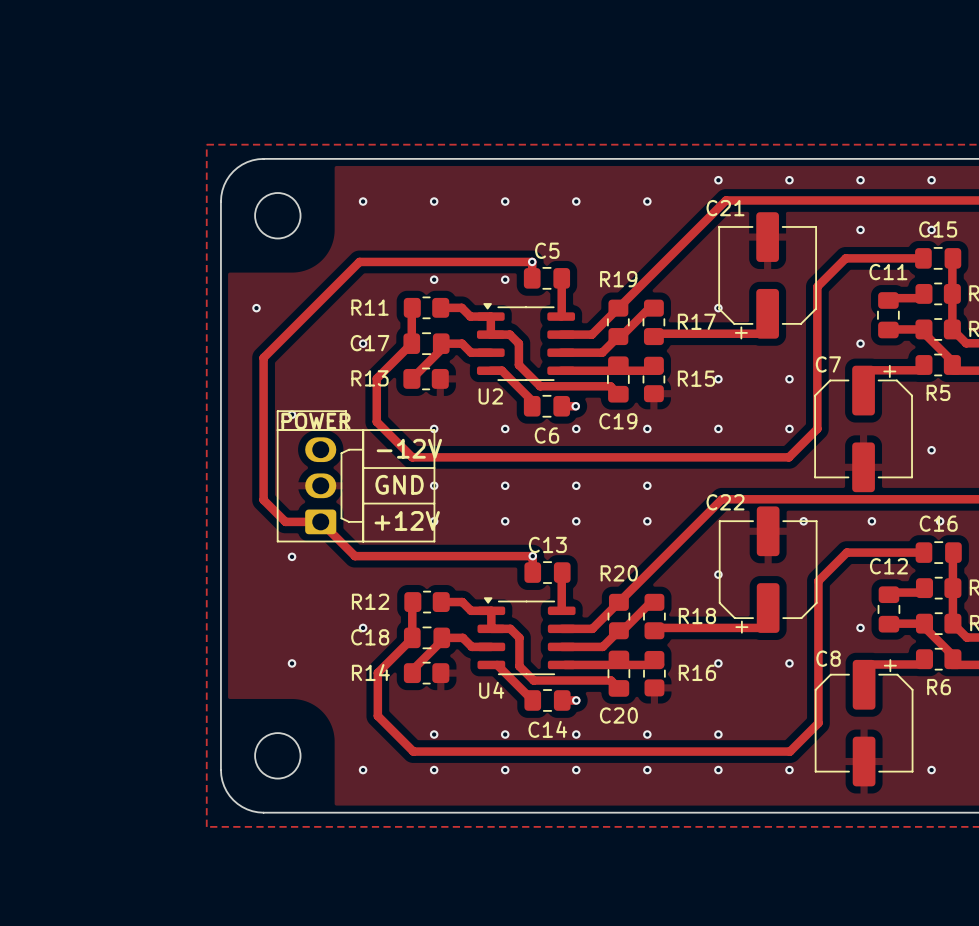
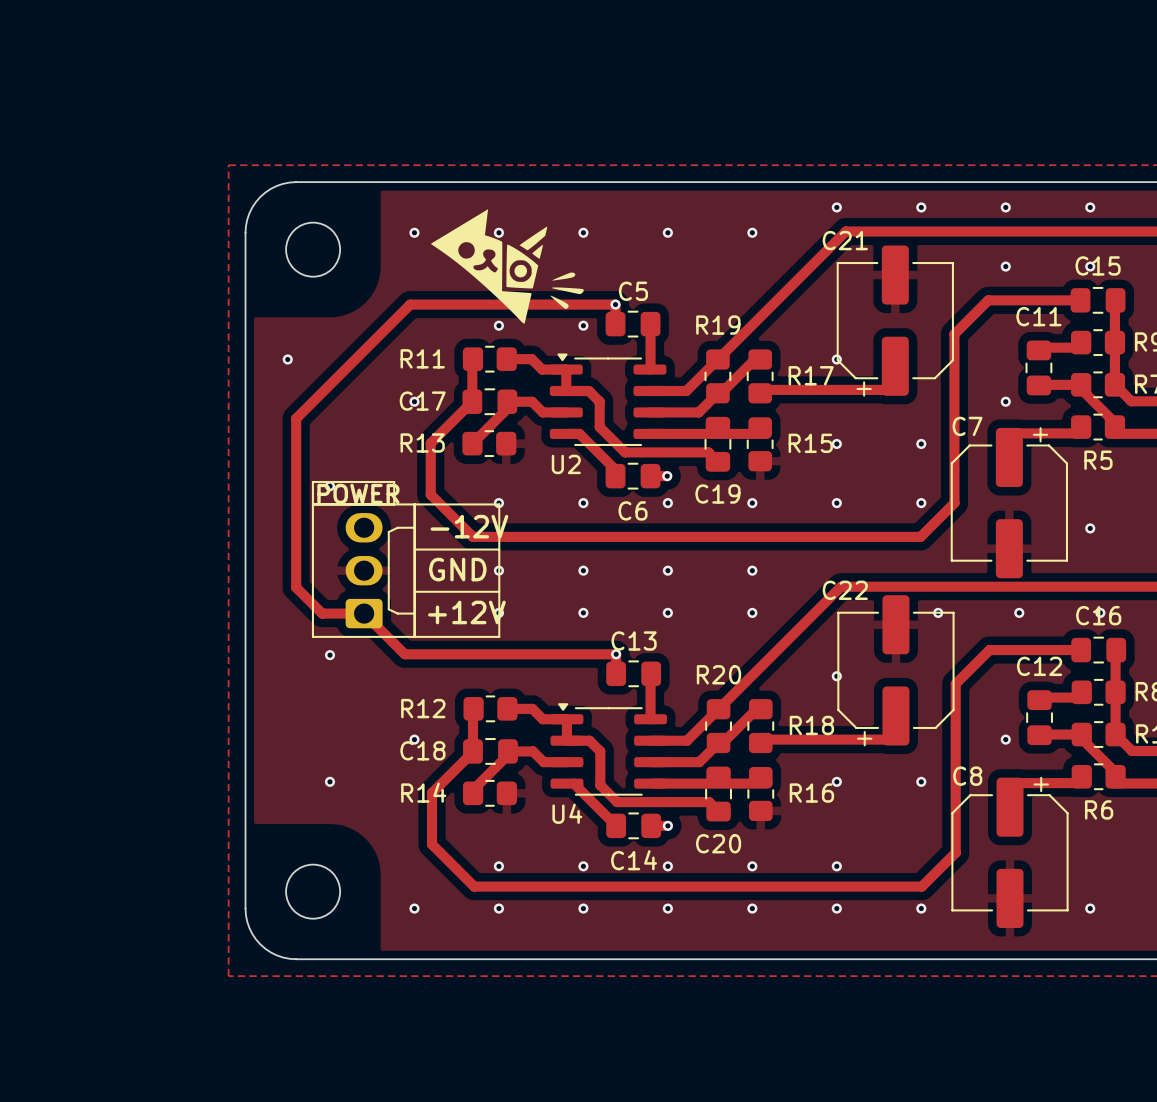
drawing: none -> [430, 209, 584, 324]

